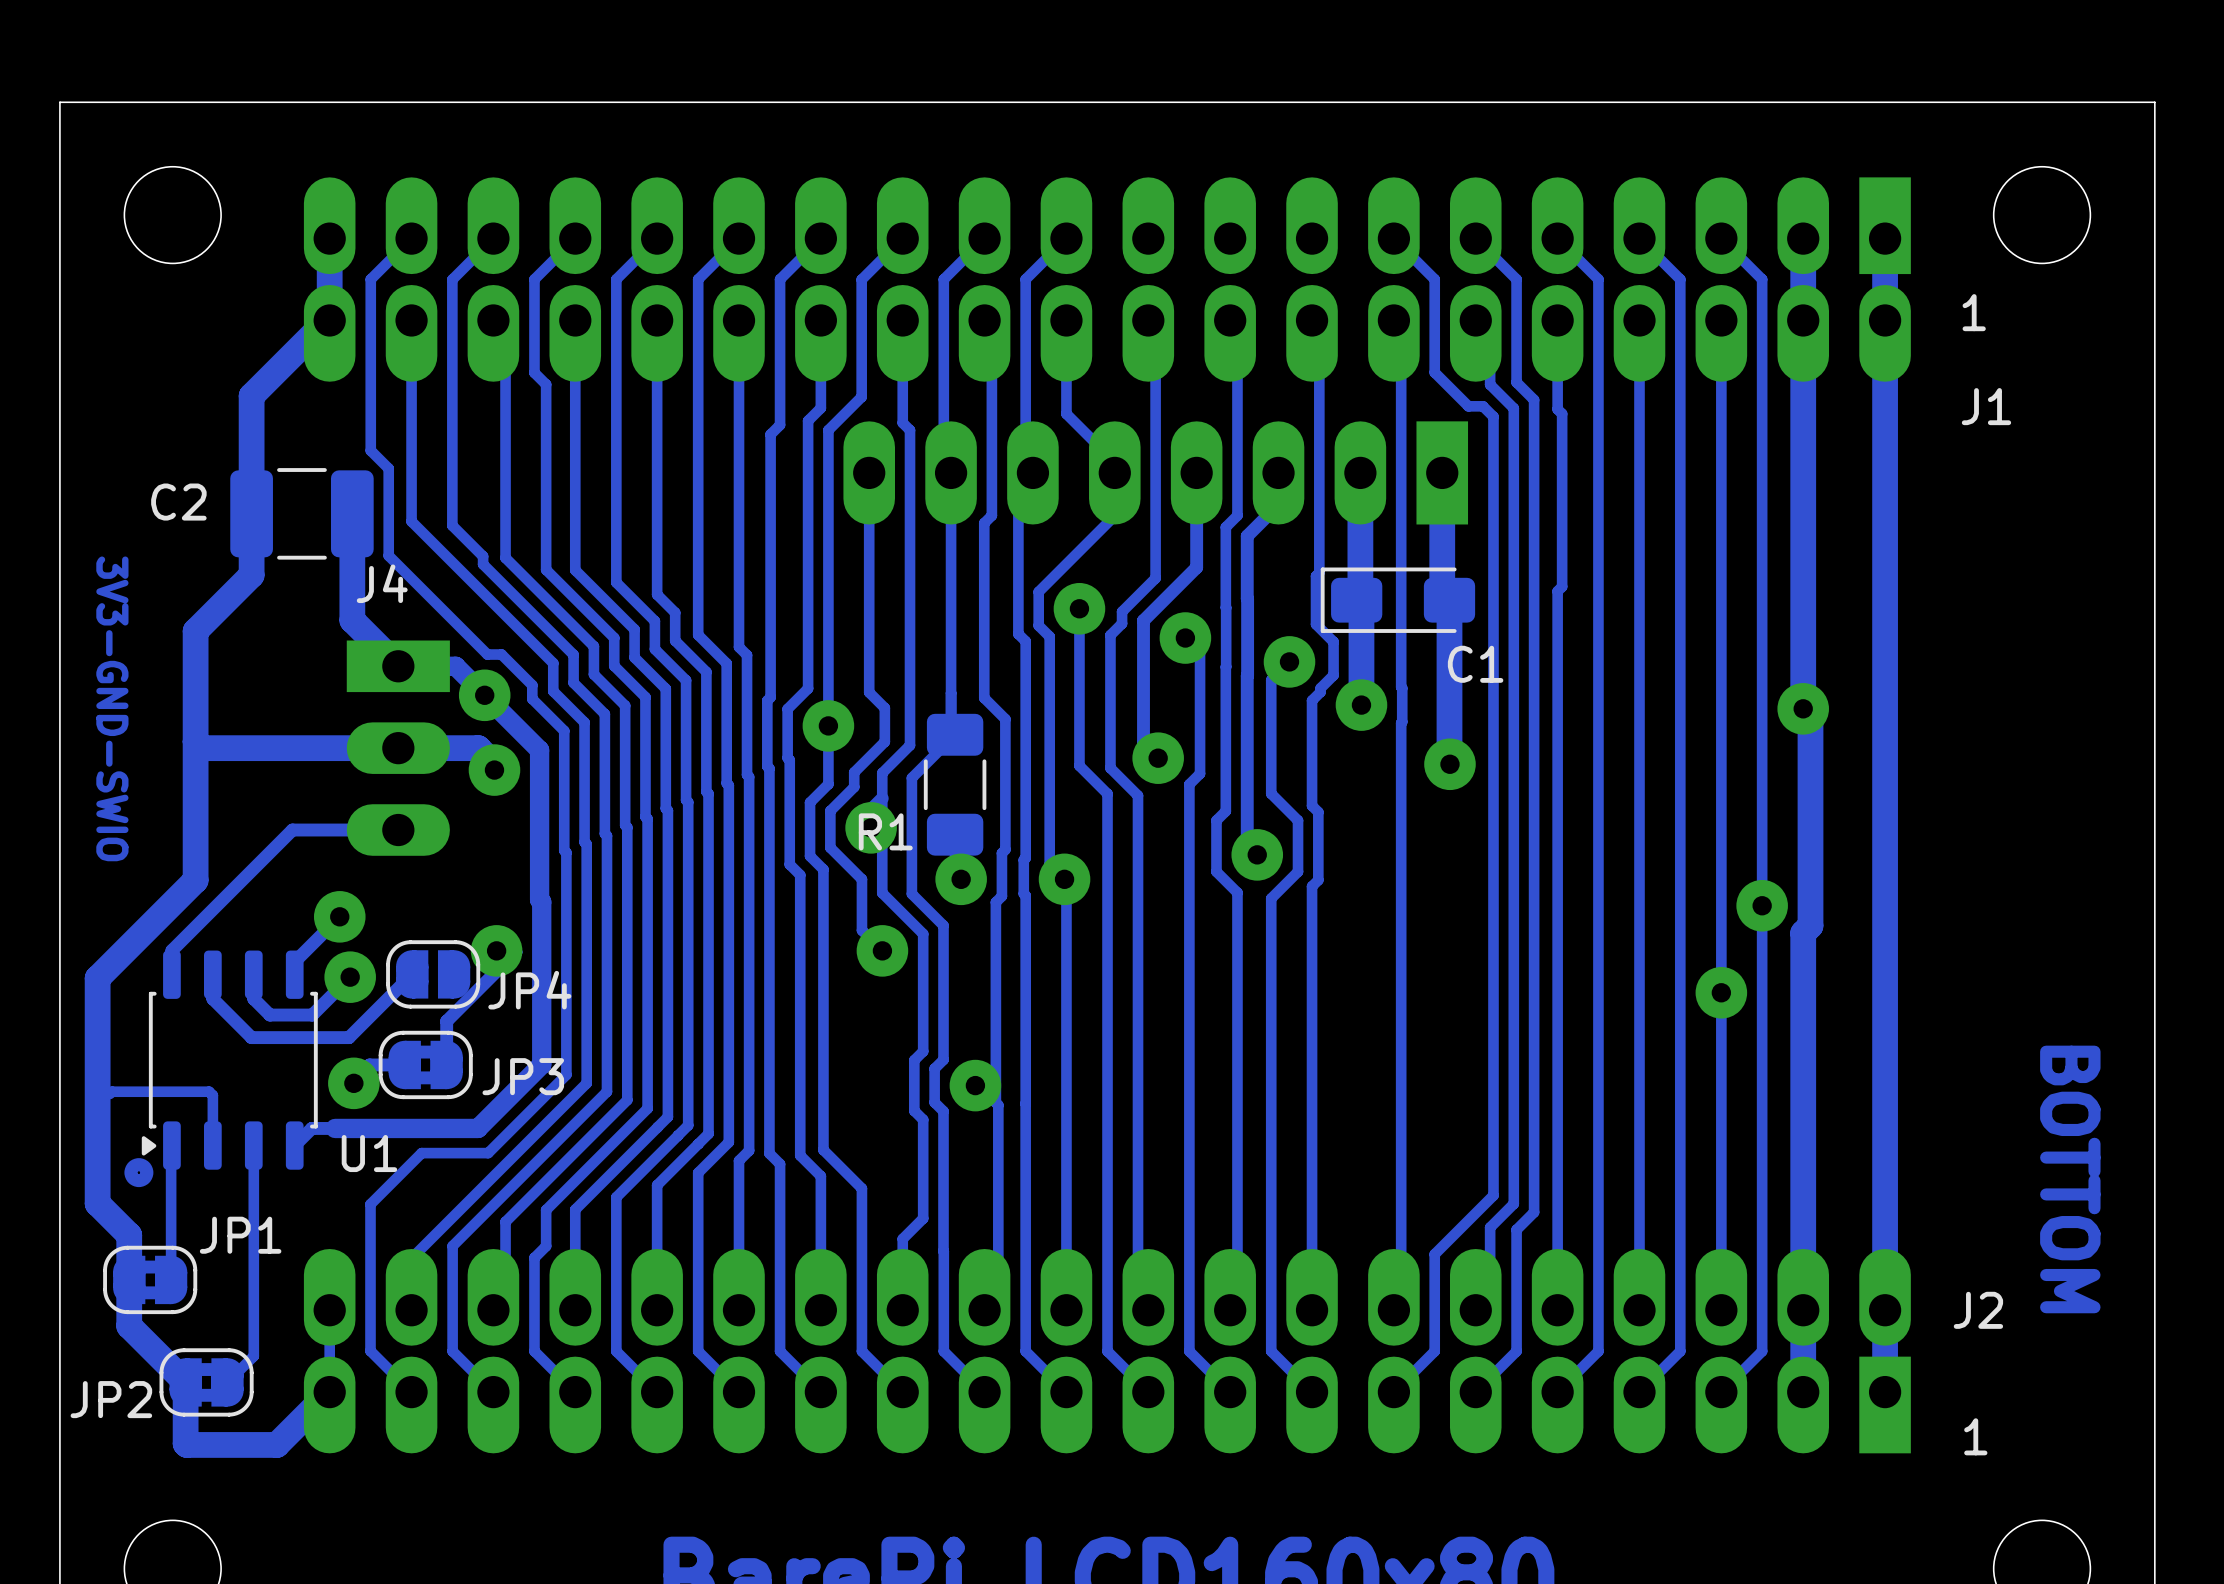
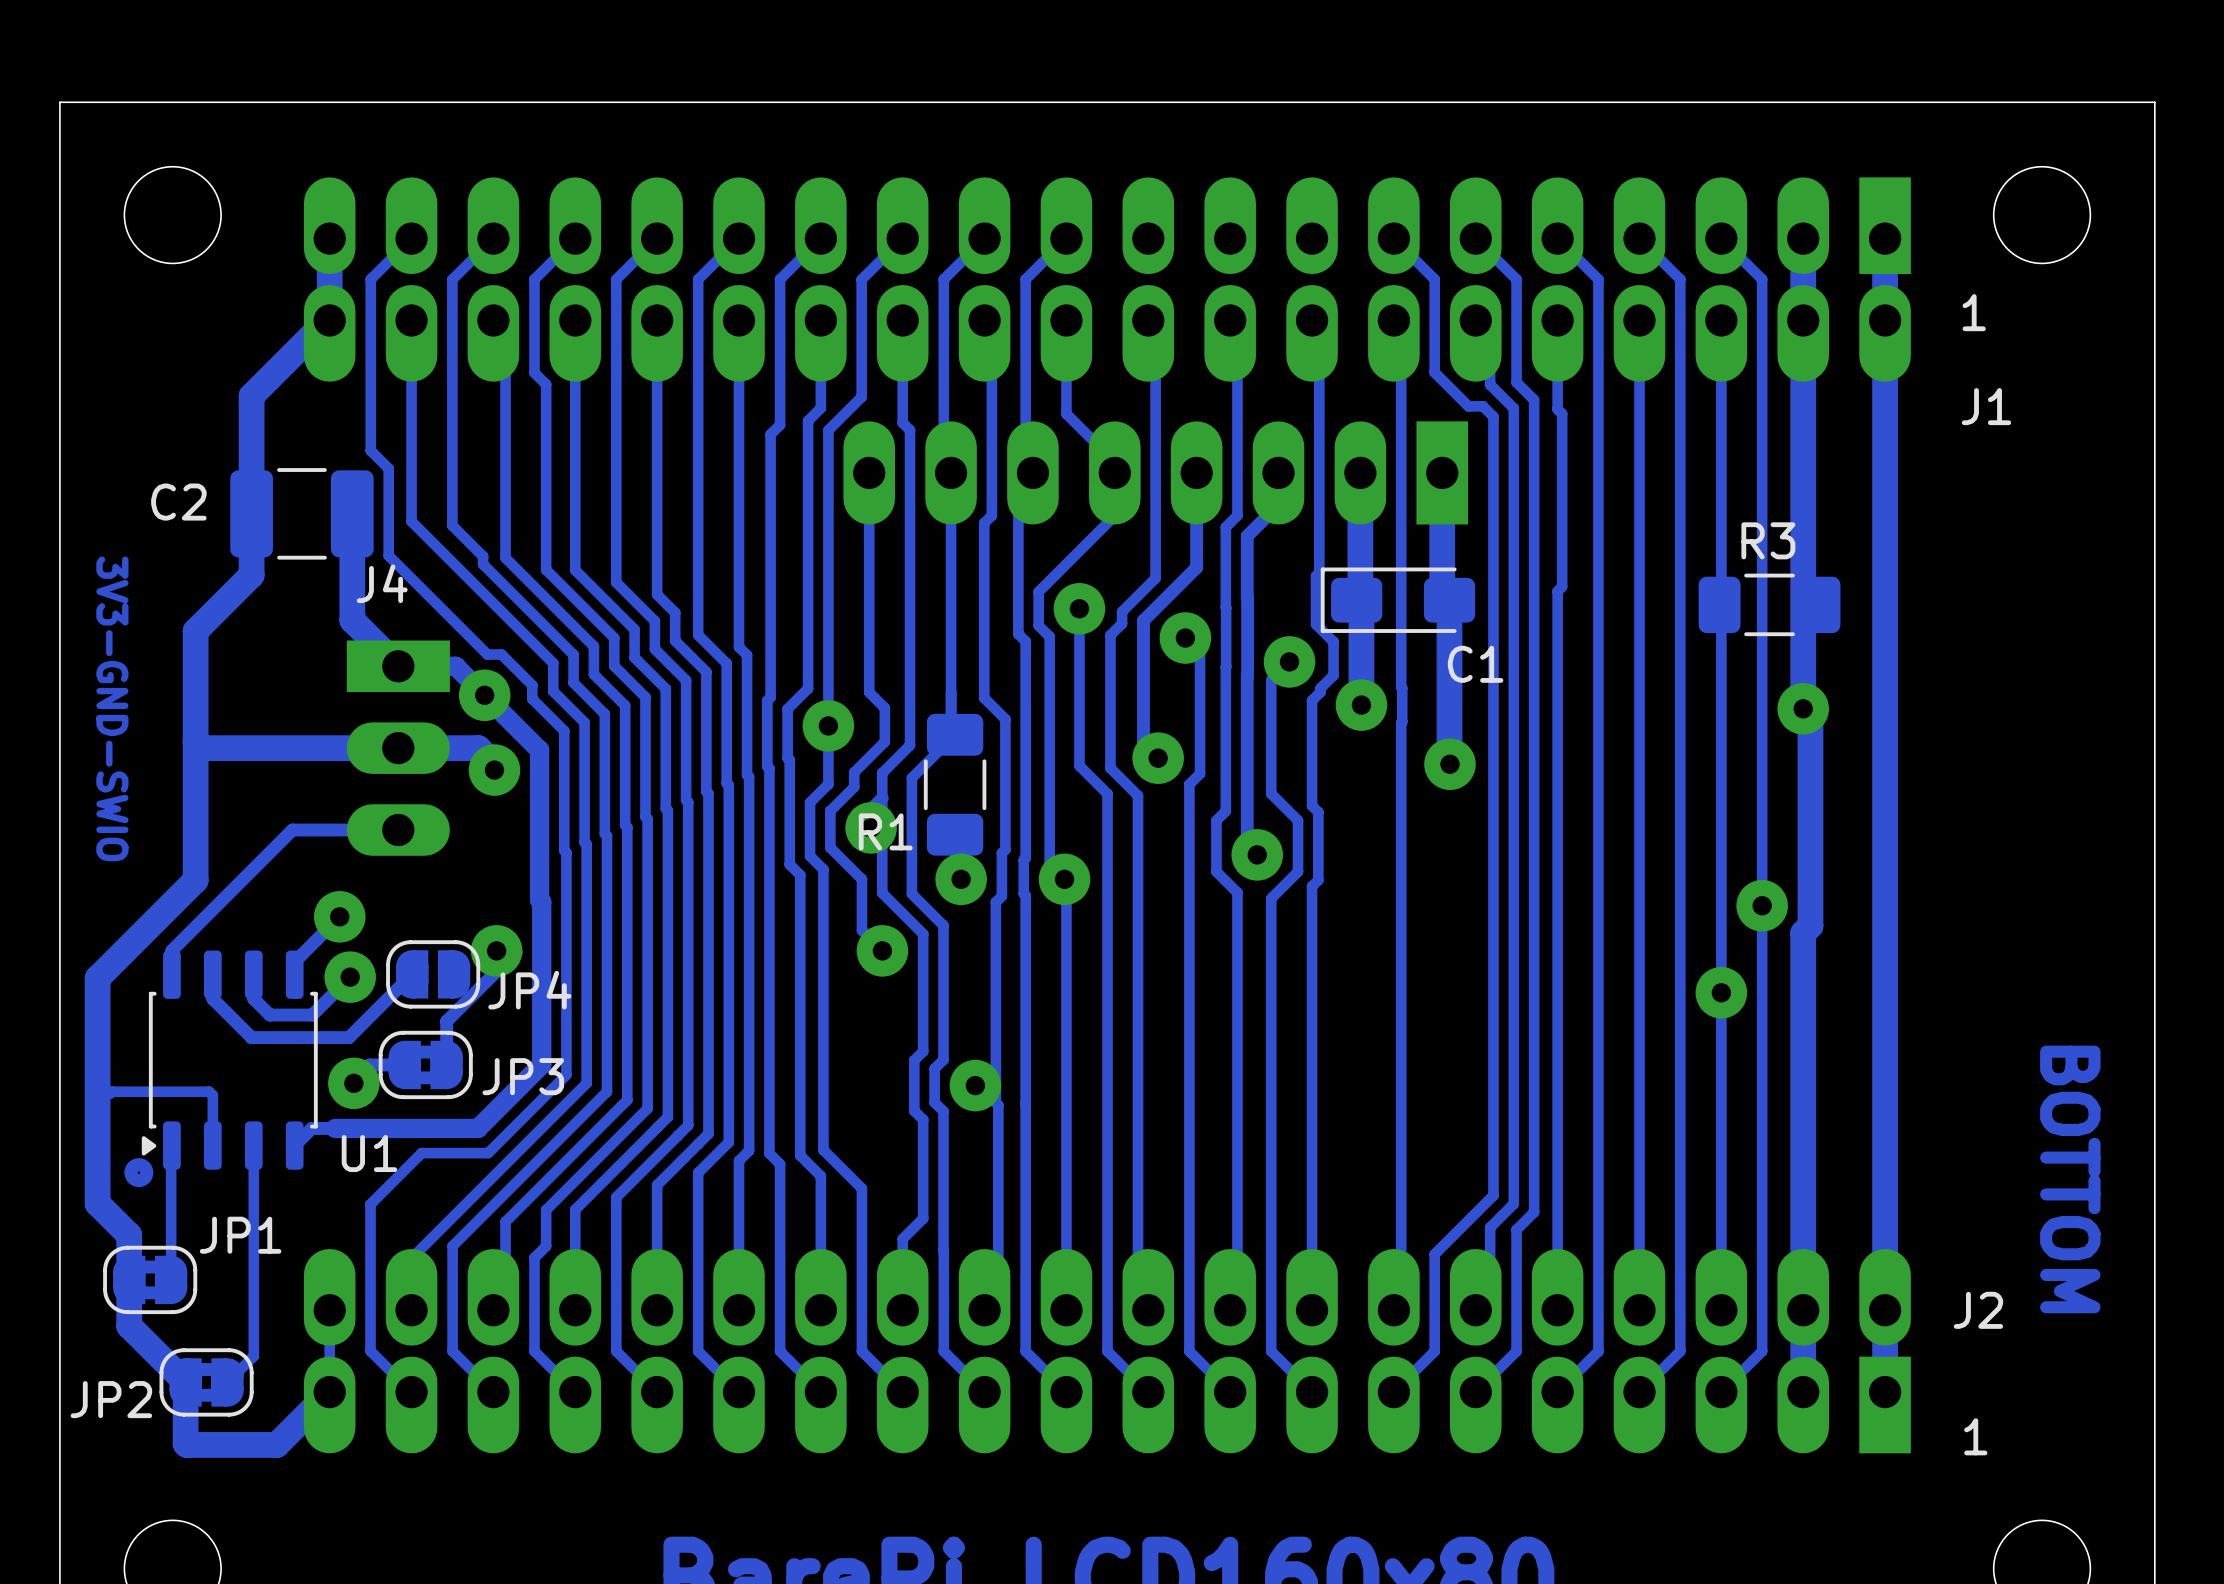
R3: none -> (1769, 604)

